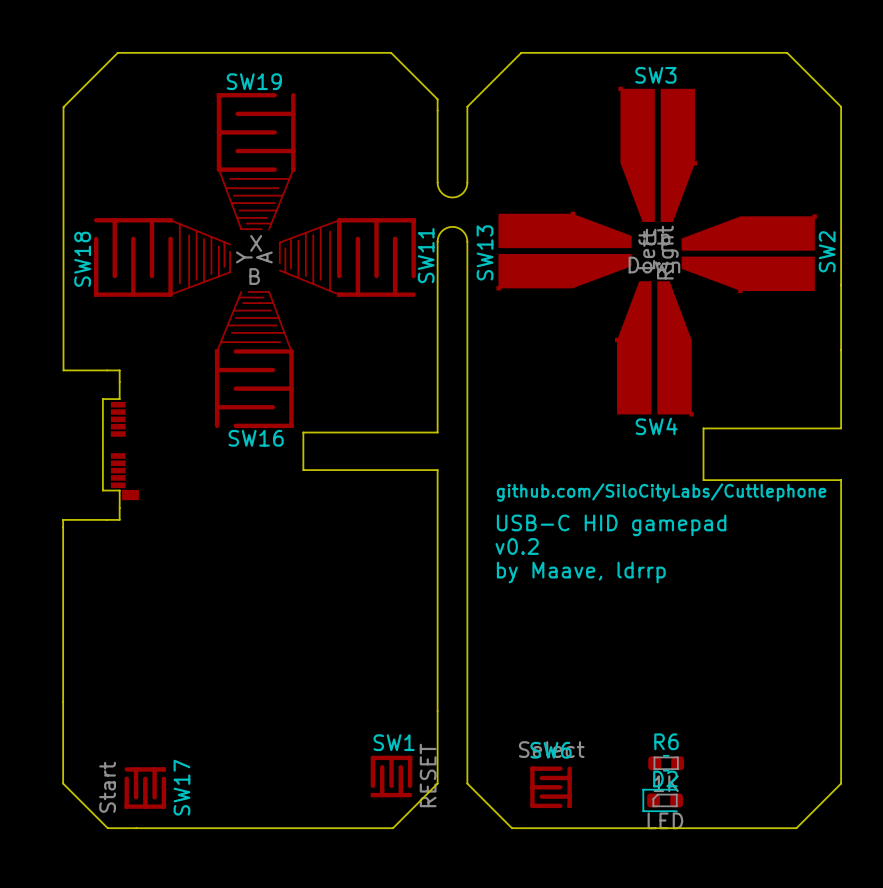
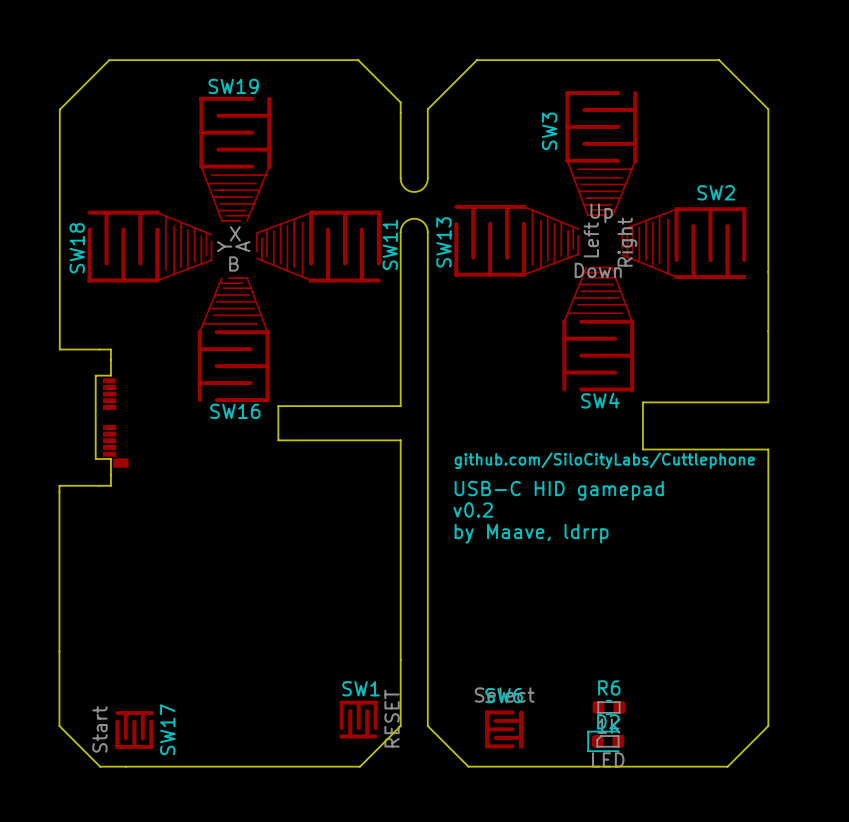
SW3 name position: SW3 (655, 75) -> SW3 (549, 131)
SW3 footprint: [618, 86, 698, 223] -> [565, 91, 638, 216]
SW13 footprint: [496, 211, 632, 291] -> [454, 204, 580, 277]
SW2 footprint: [681, 214, 817, 294] -> [621, 207, 747, 280]
SW2 name position: SW2 (827, 251) -> SW2 (716, 192)
SW4 footprint: [615, 281, 694, 417] -> [562, 266, 635, 392]

